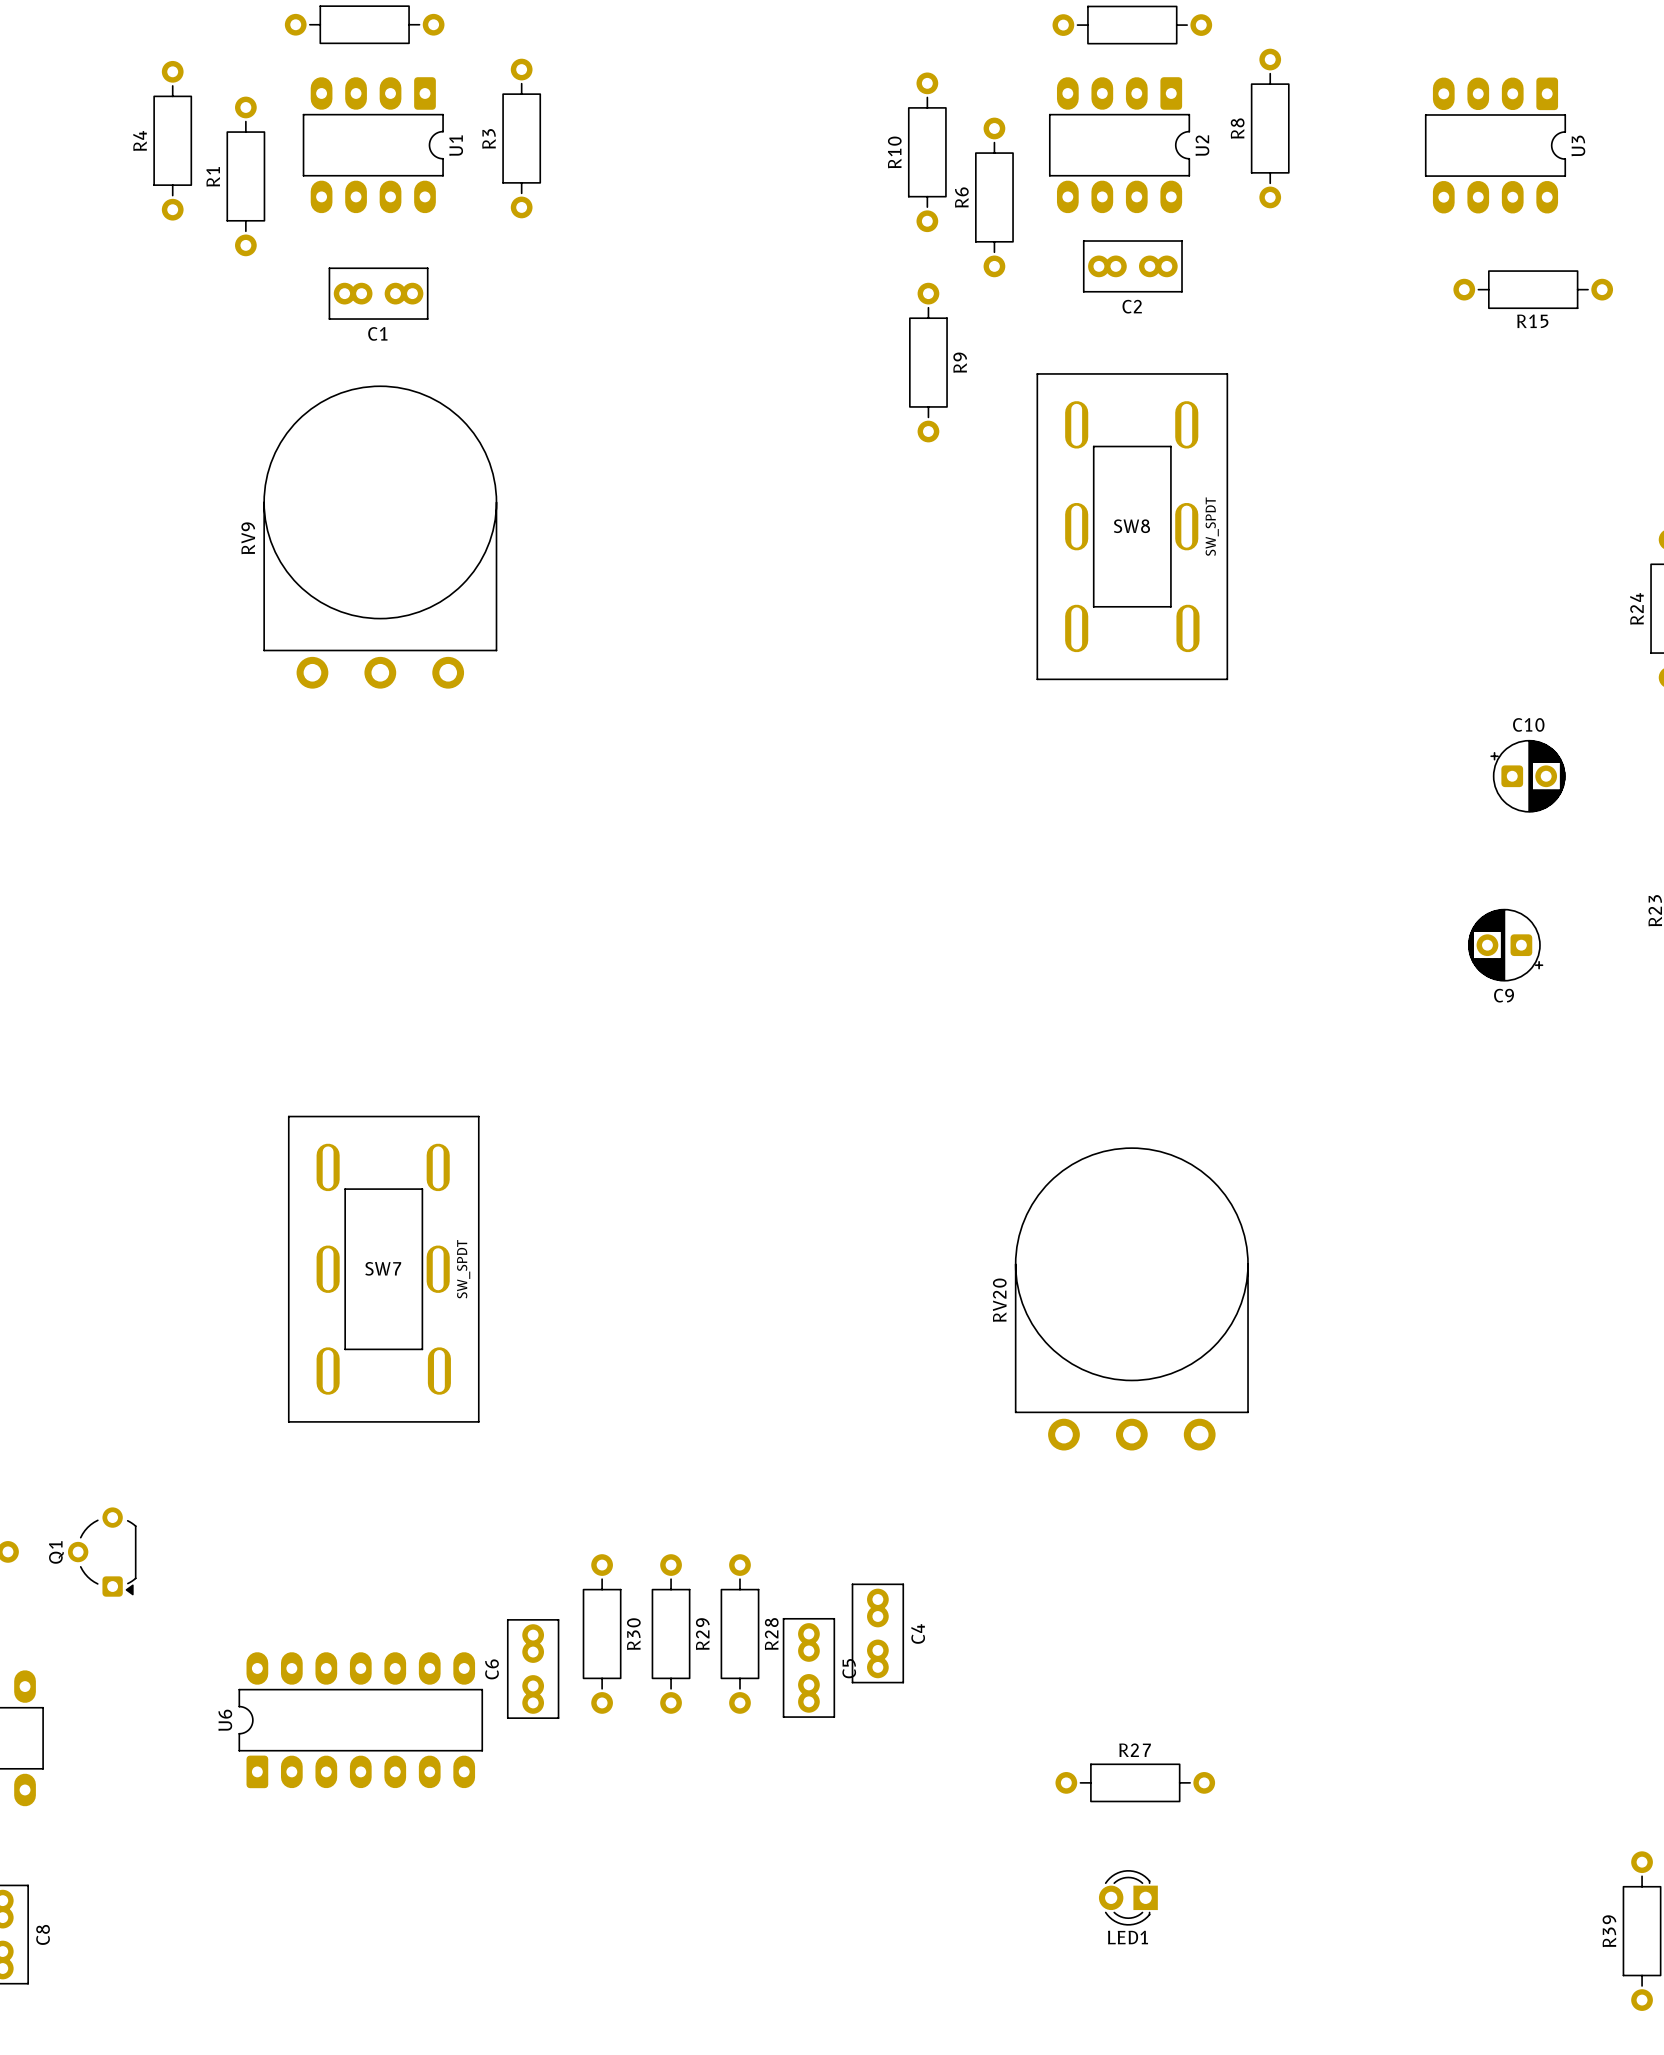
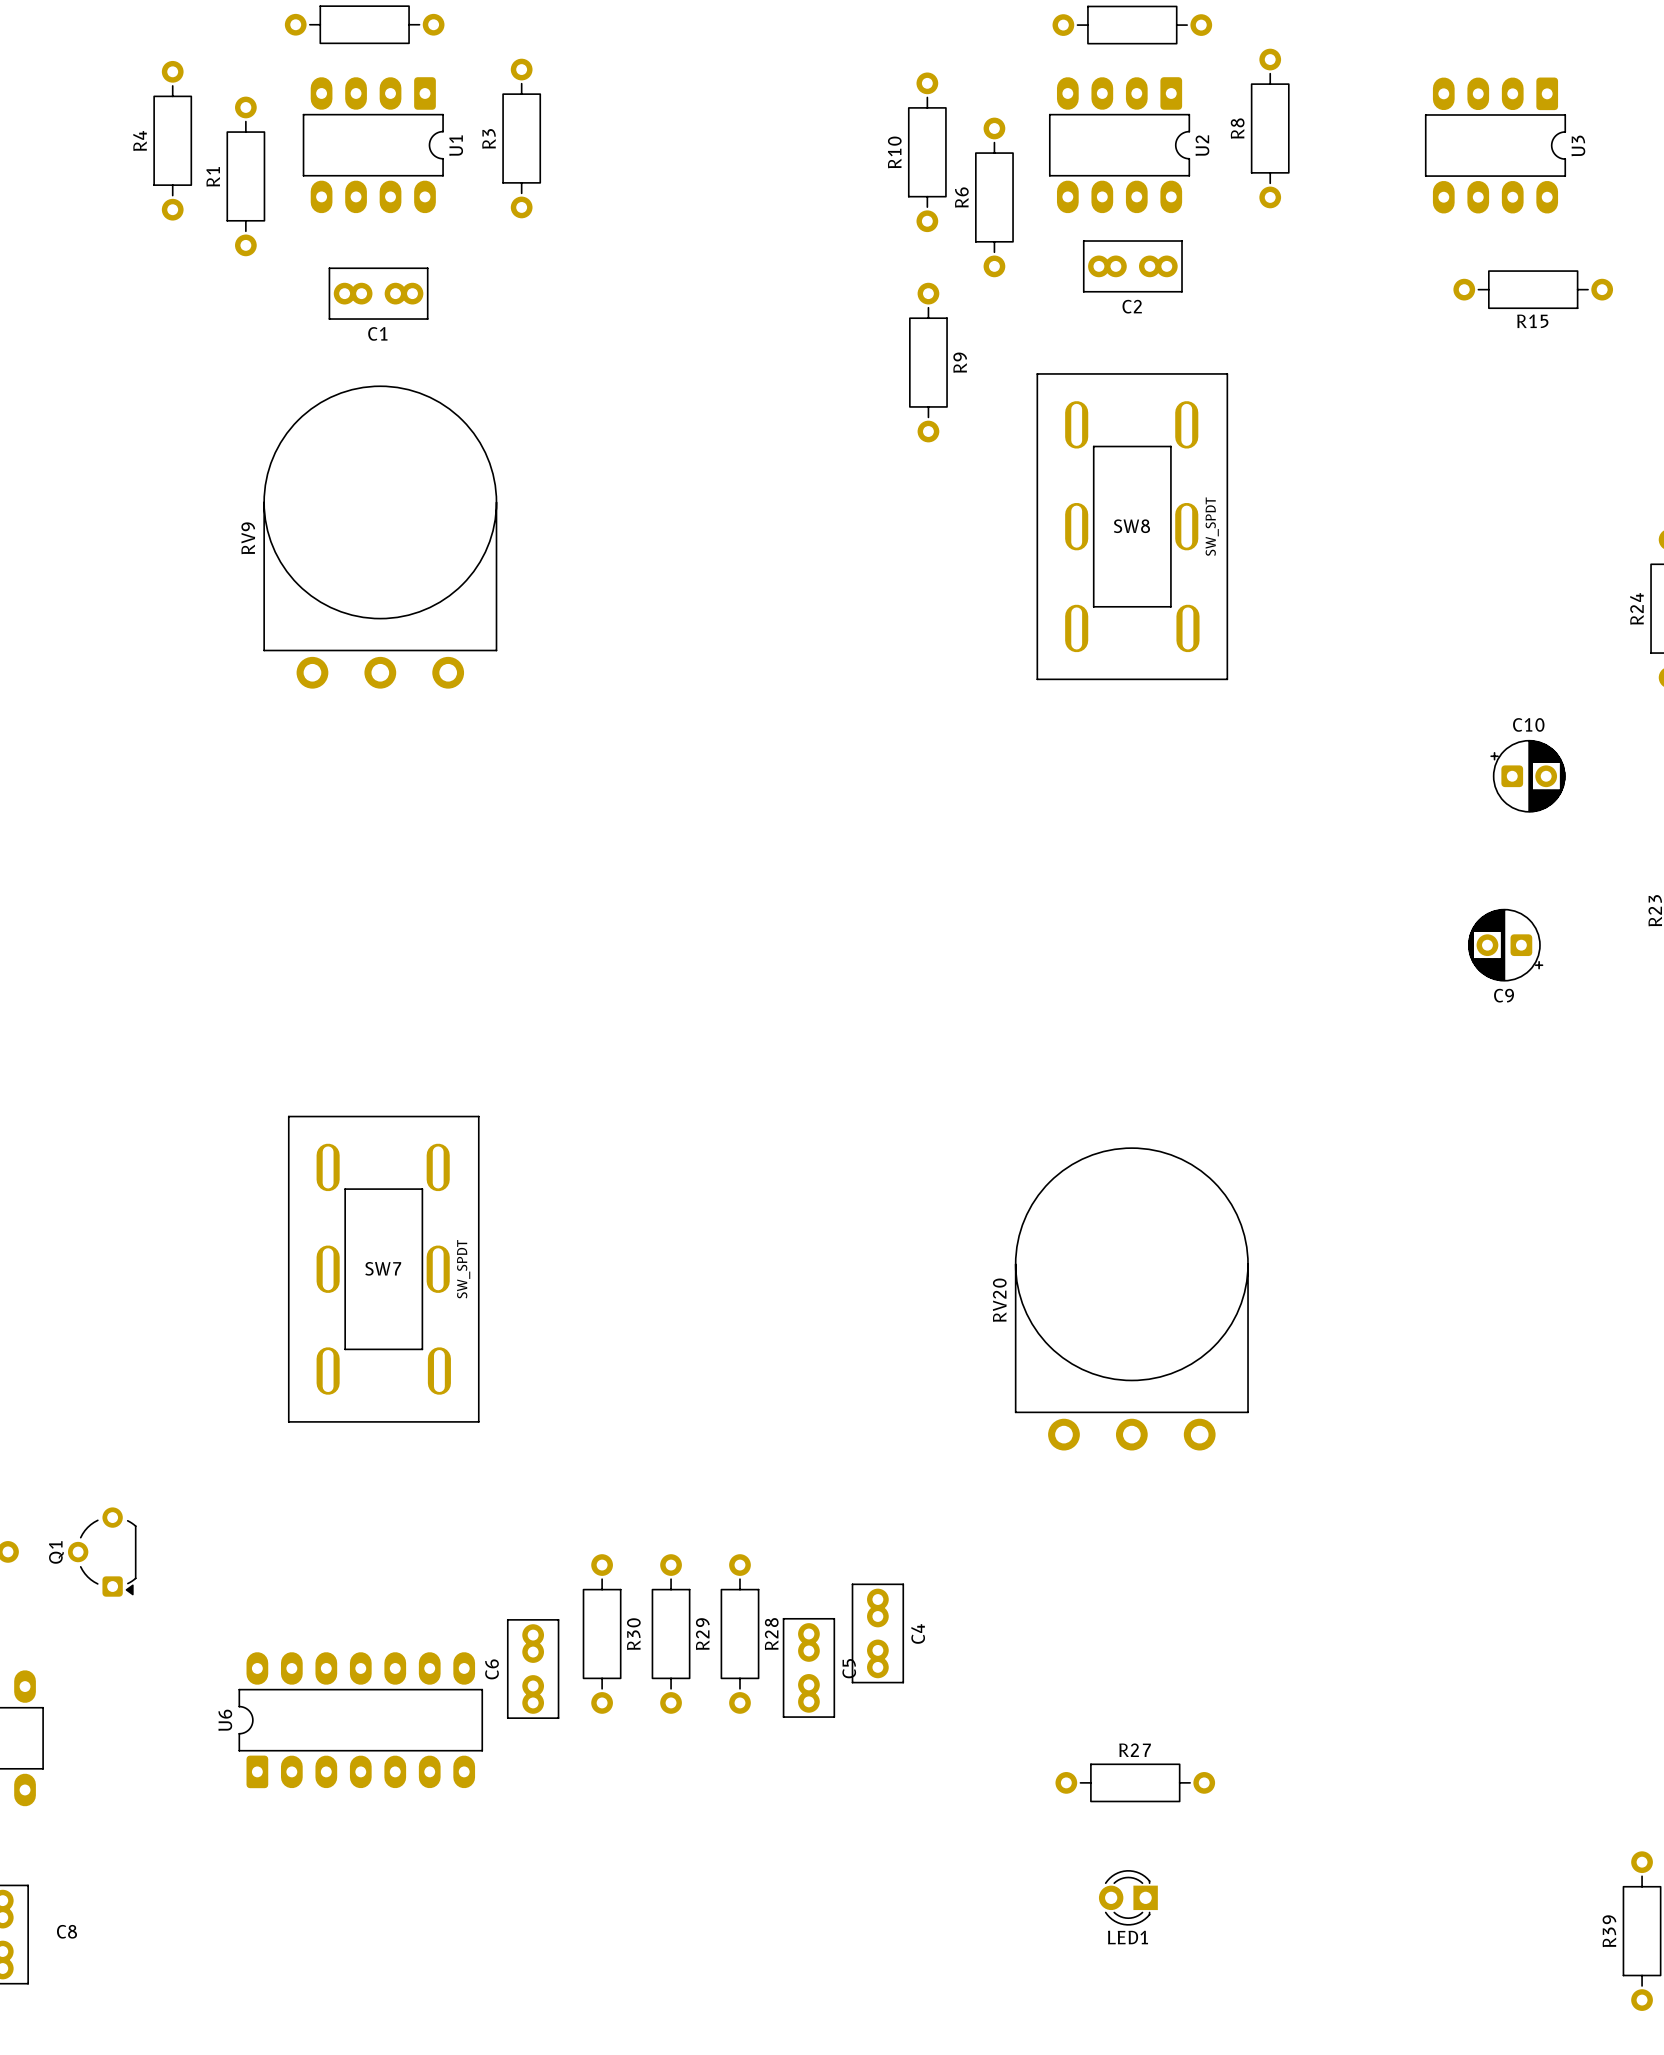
C8 name rotation: 0° (43, 1934) -> 90° clockwise (66, 1931)

